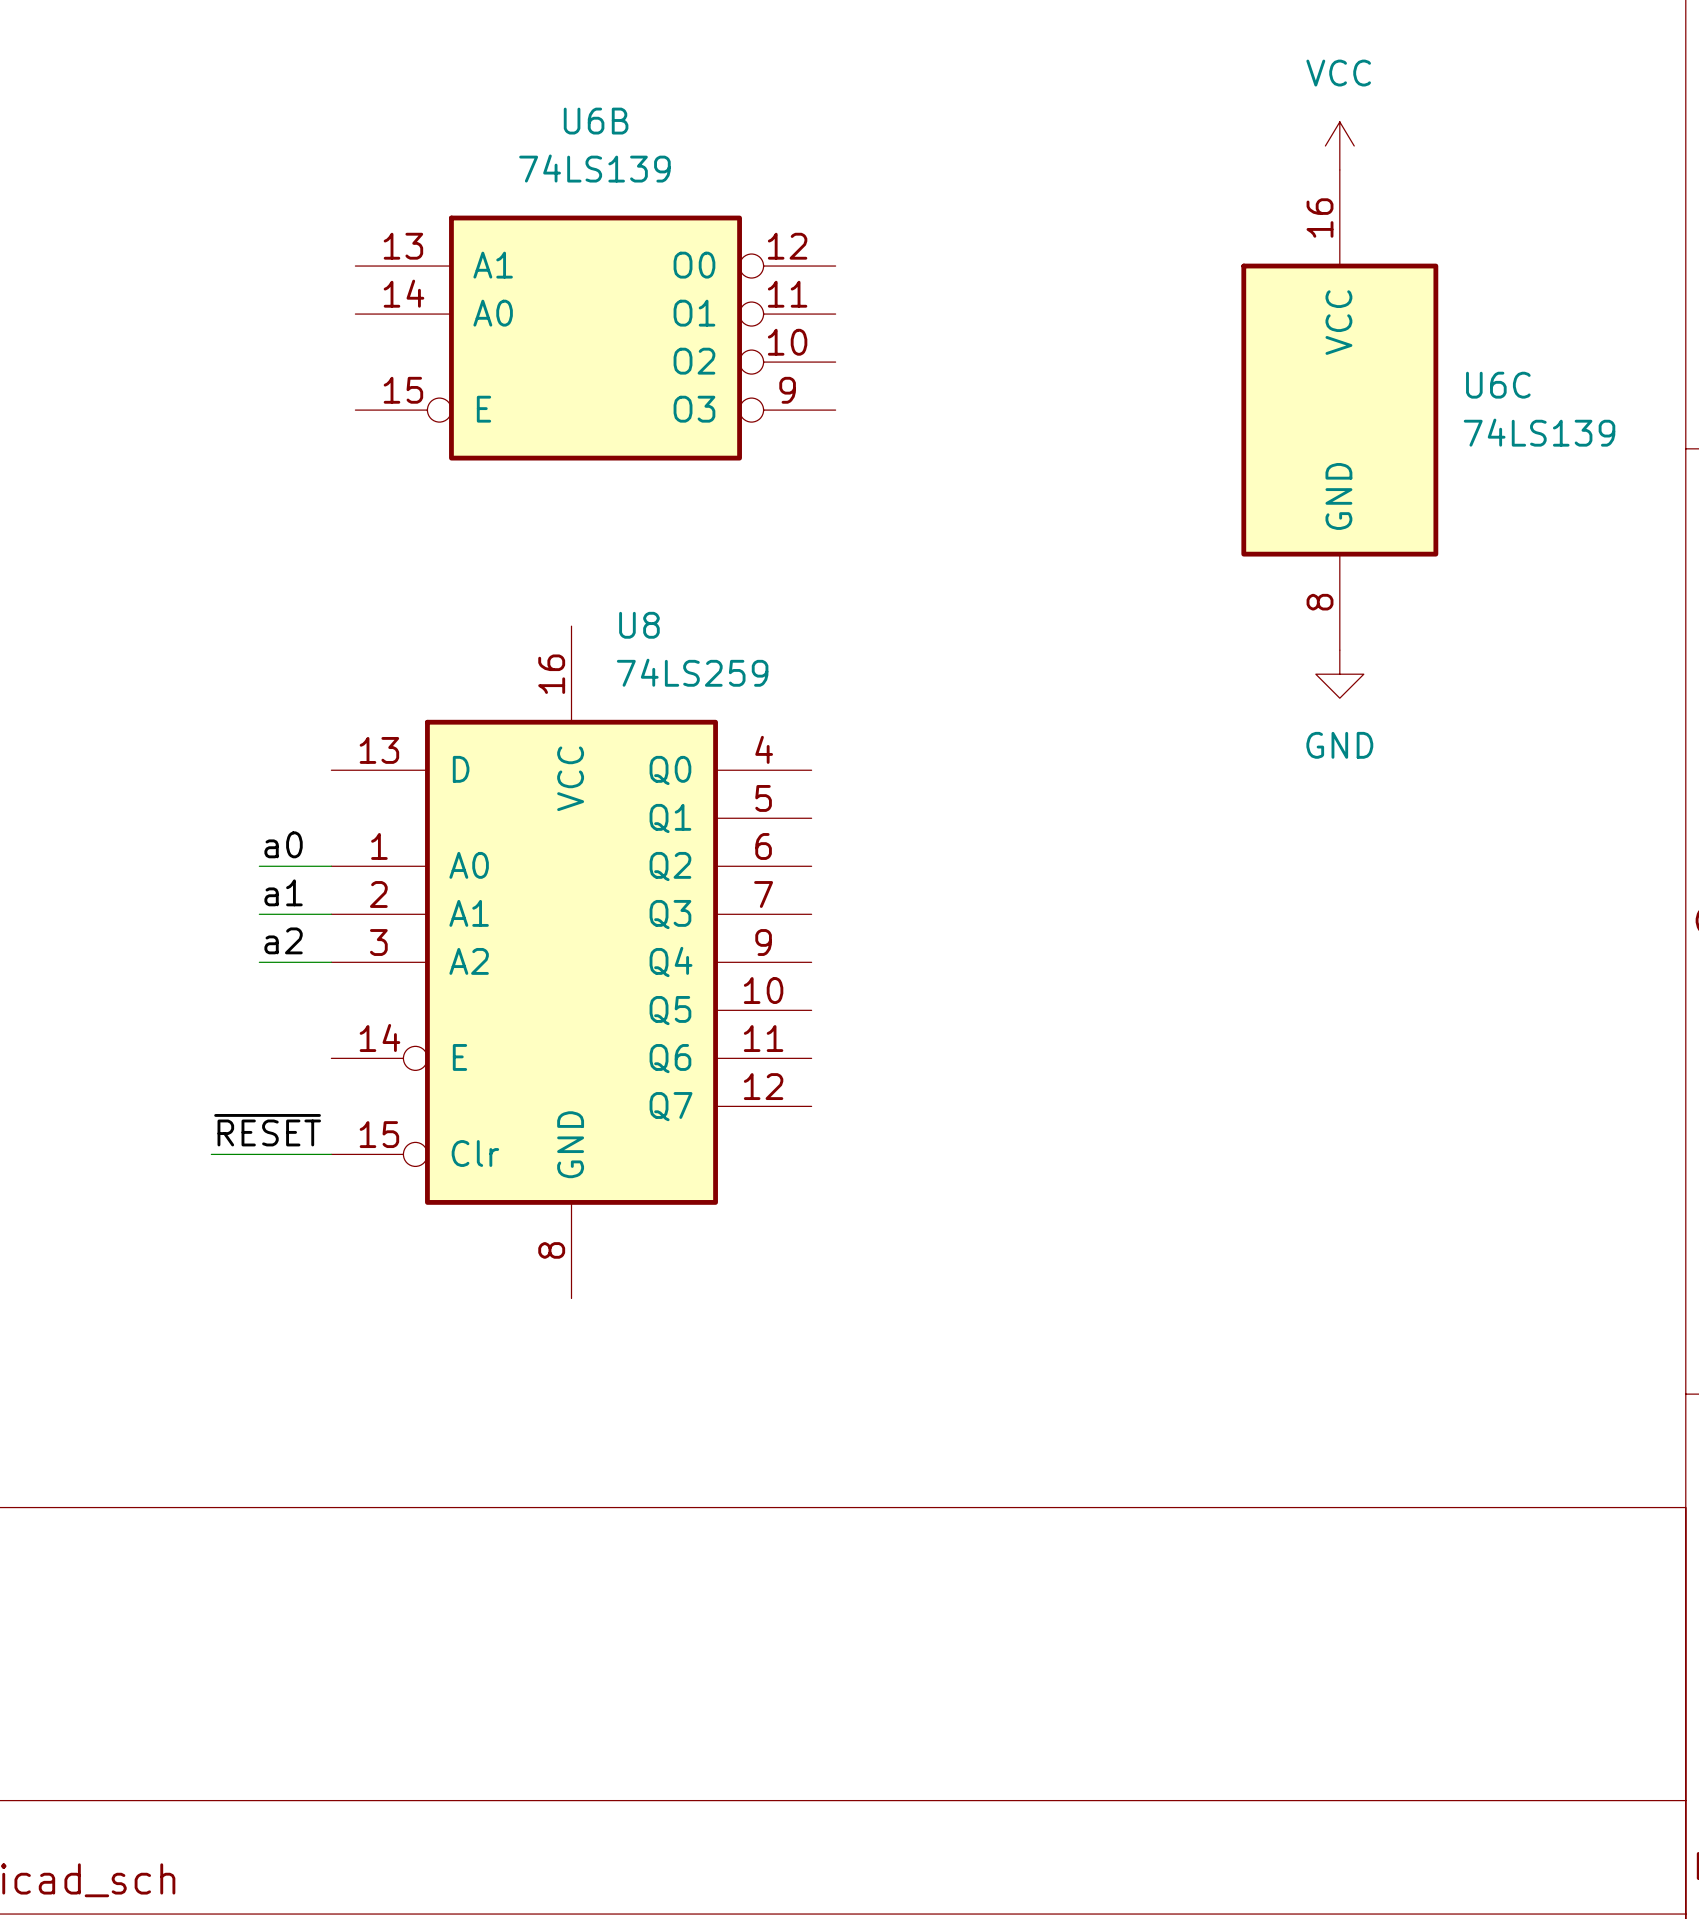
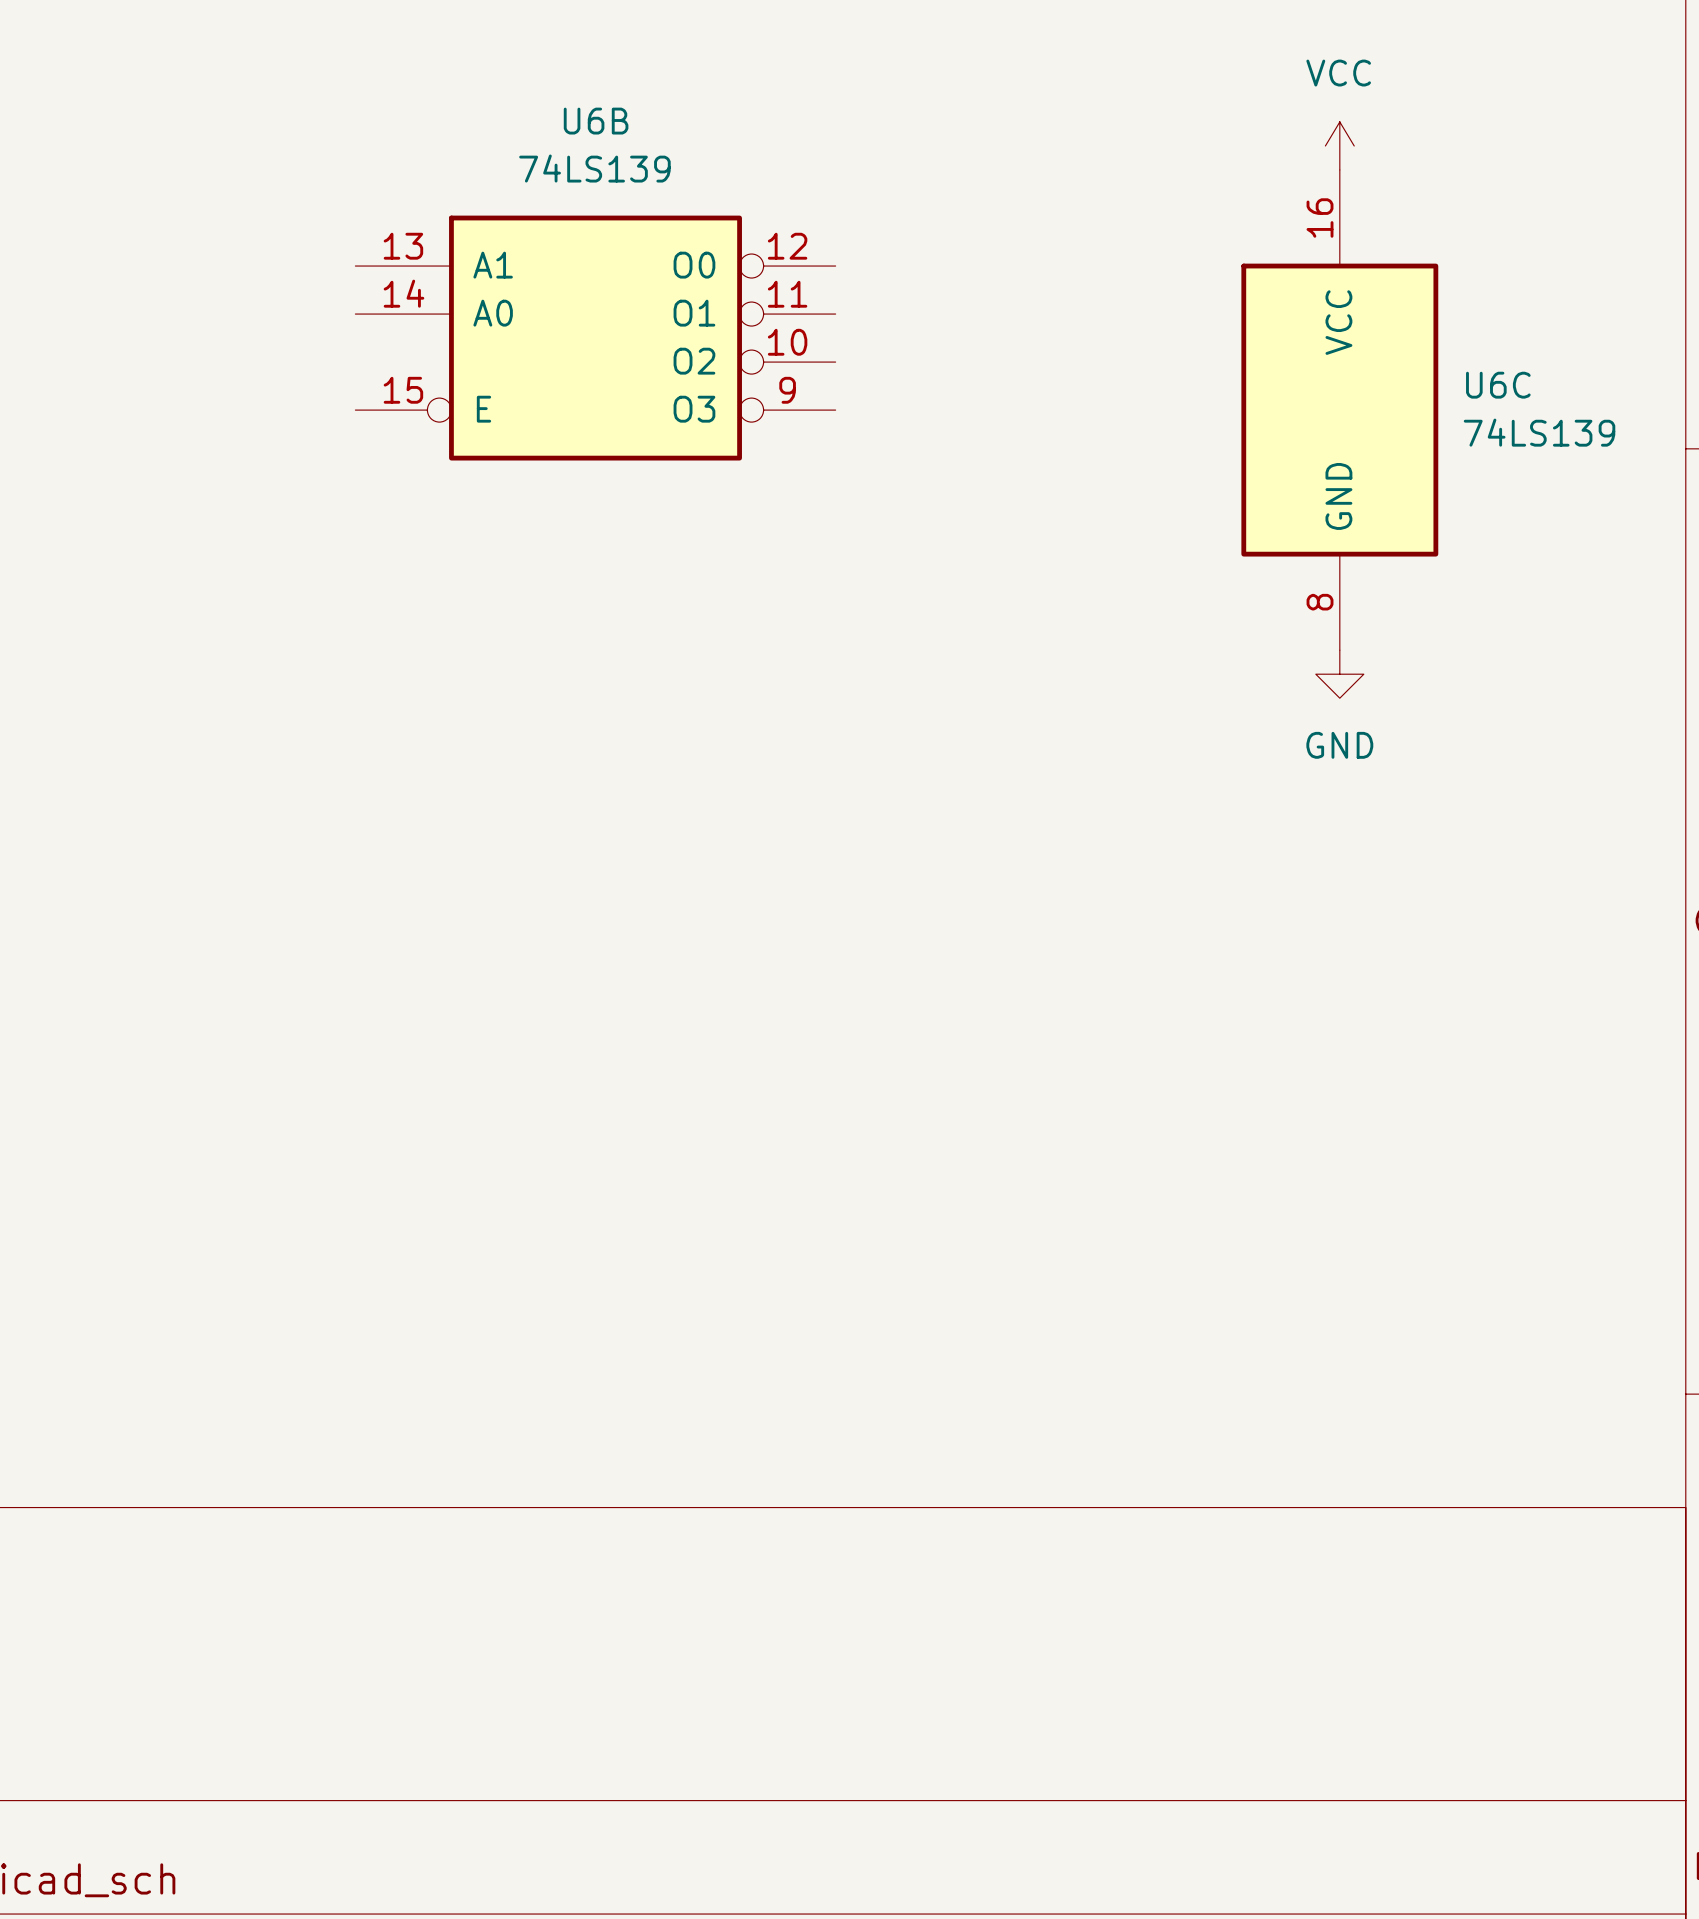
label: a0 (283, 844) -> none
wire: (259, 866) (331, 866) -> none
label: a1 (283, 892) -> none
wire: (259, 914) (331, 914) -> none
label: a2 (283, 940) -> none
wire: (259, 962) (331, 962) -> none
U8: 74LS259 (571, 962) -> none
label: ~{RESET} (267, 1130) -> none
wire: (211, 1154) (331, 1154) -> none

